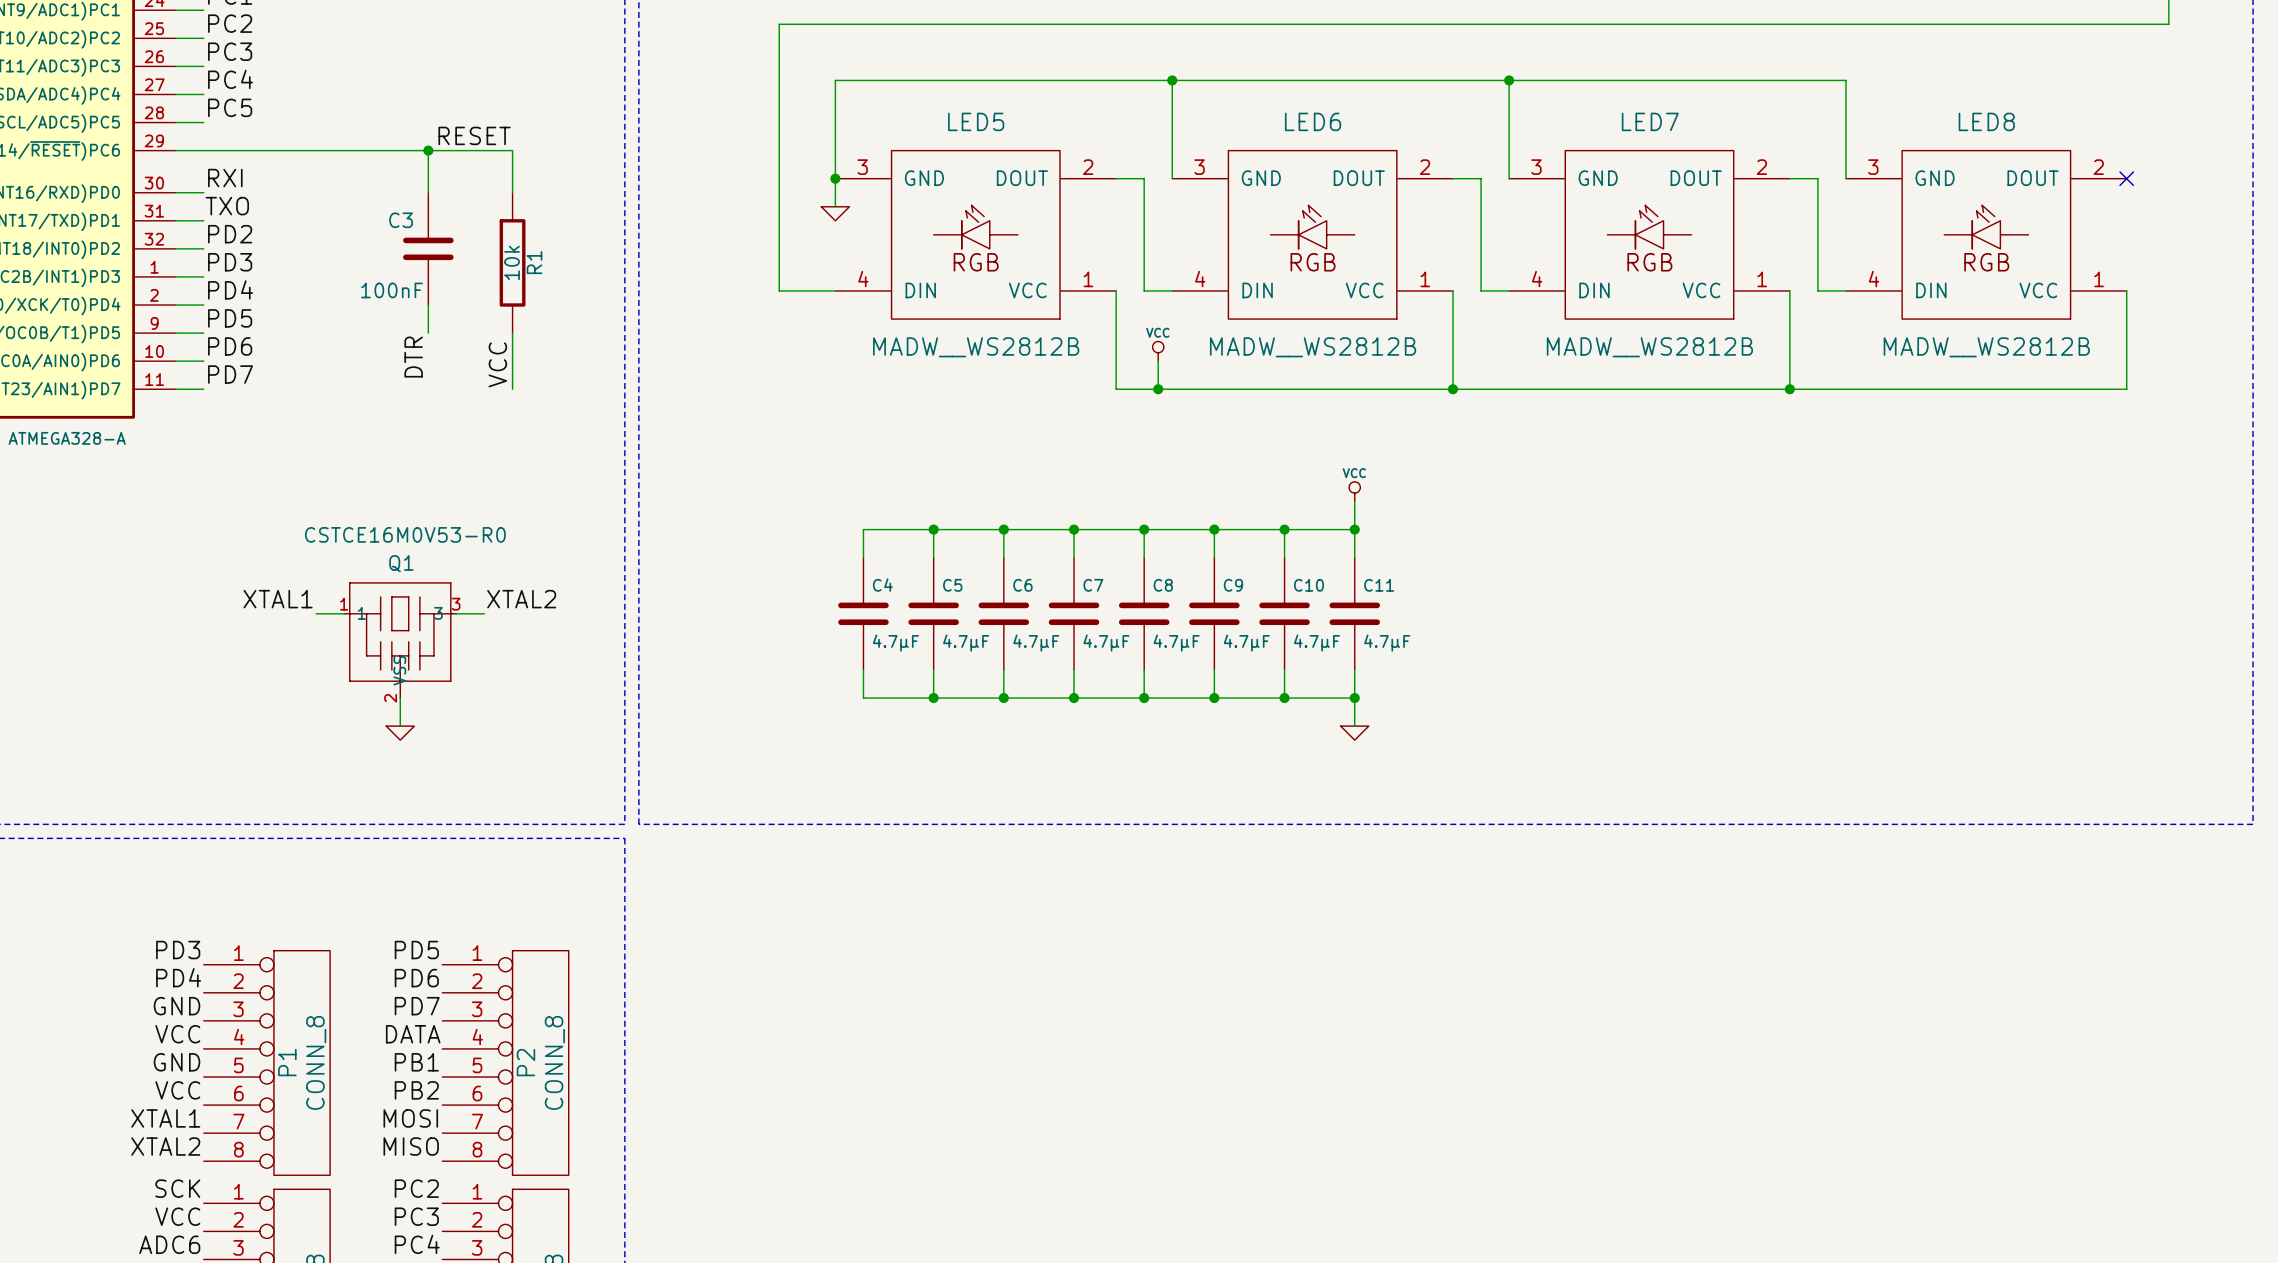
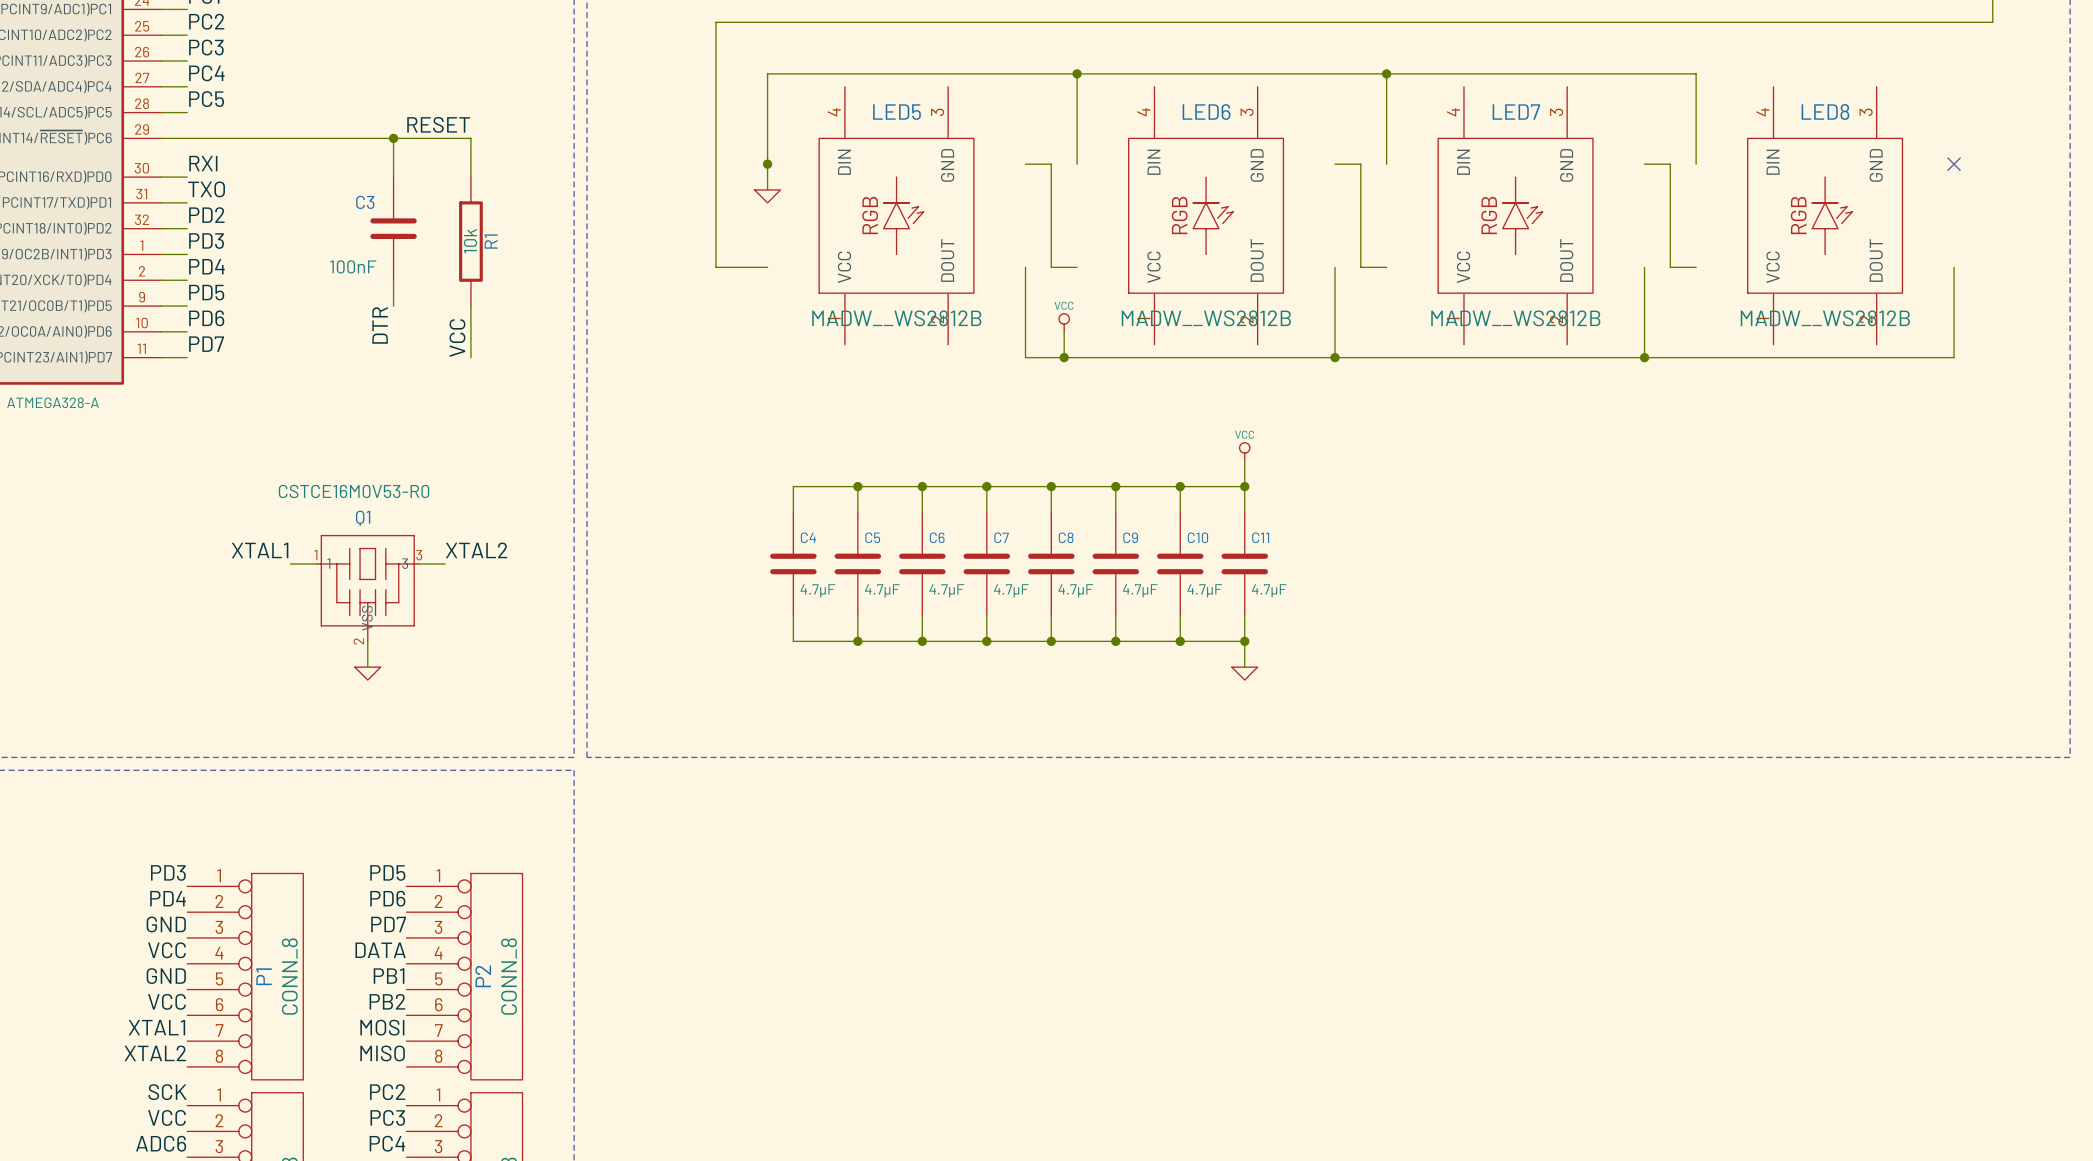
LED5 rotation: 0° (975, 234) -> 90° clockwise (896, 215)
LED6 rotation: 0° (1312, 234) -> 90° clockwise (1206, 215)
LED7 rotation: 0° (1649, 234) -> 90° clockwise (1515, 215)
LED8 rotation: 0° (1986, 234) -> 90° clockwise (1825, 215)

